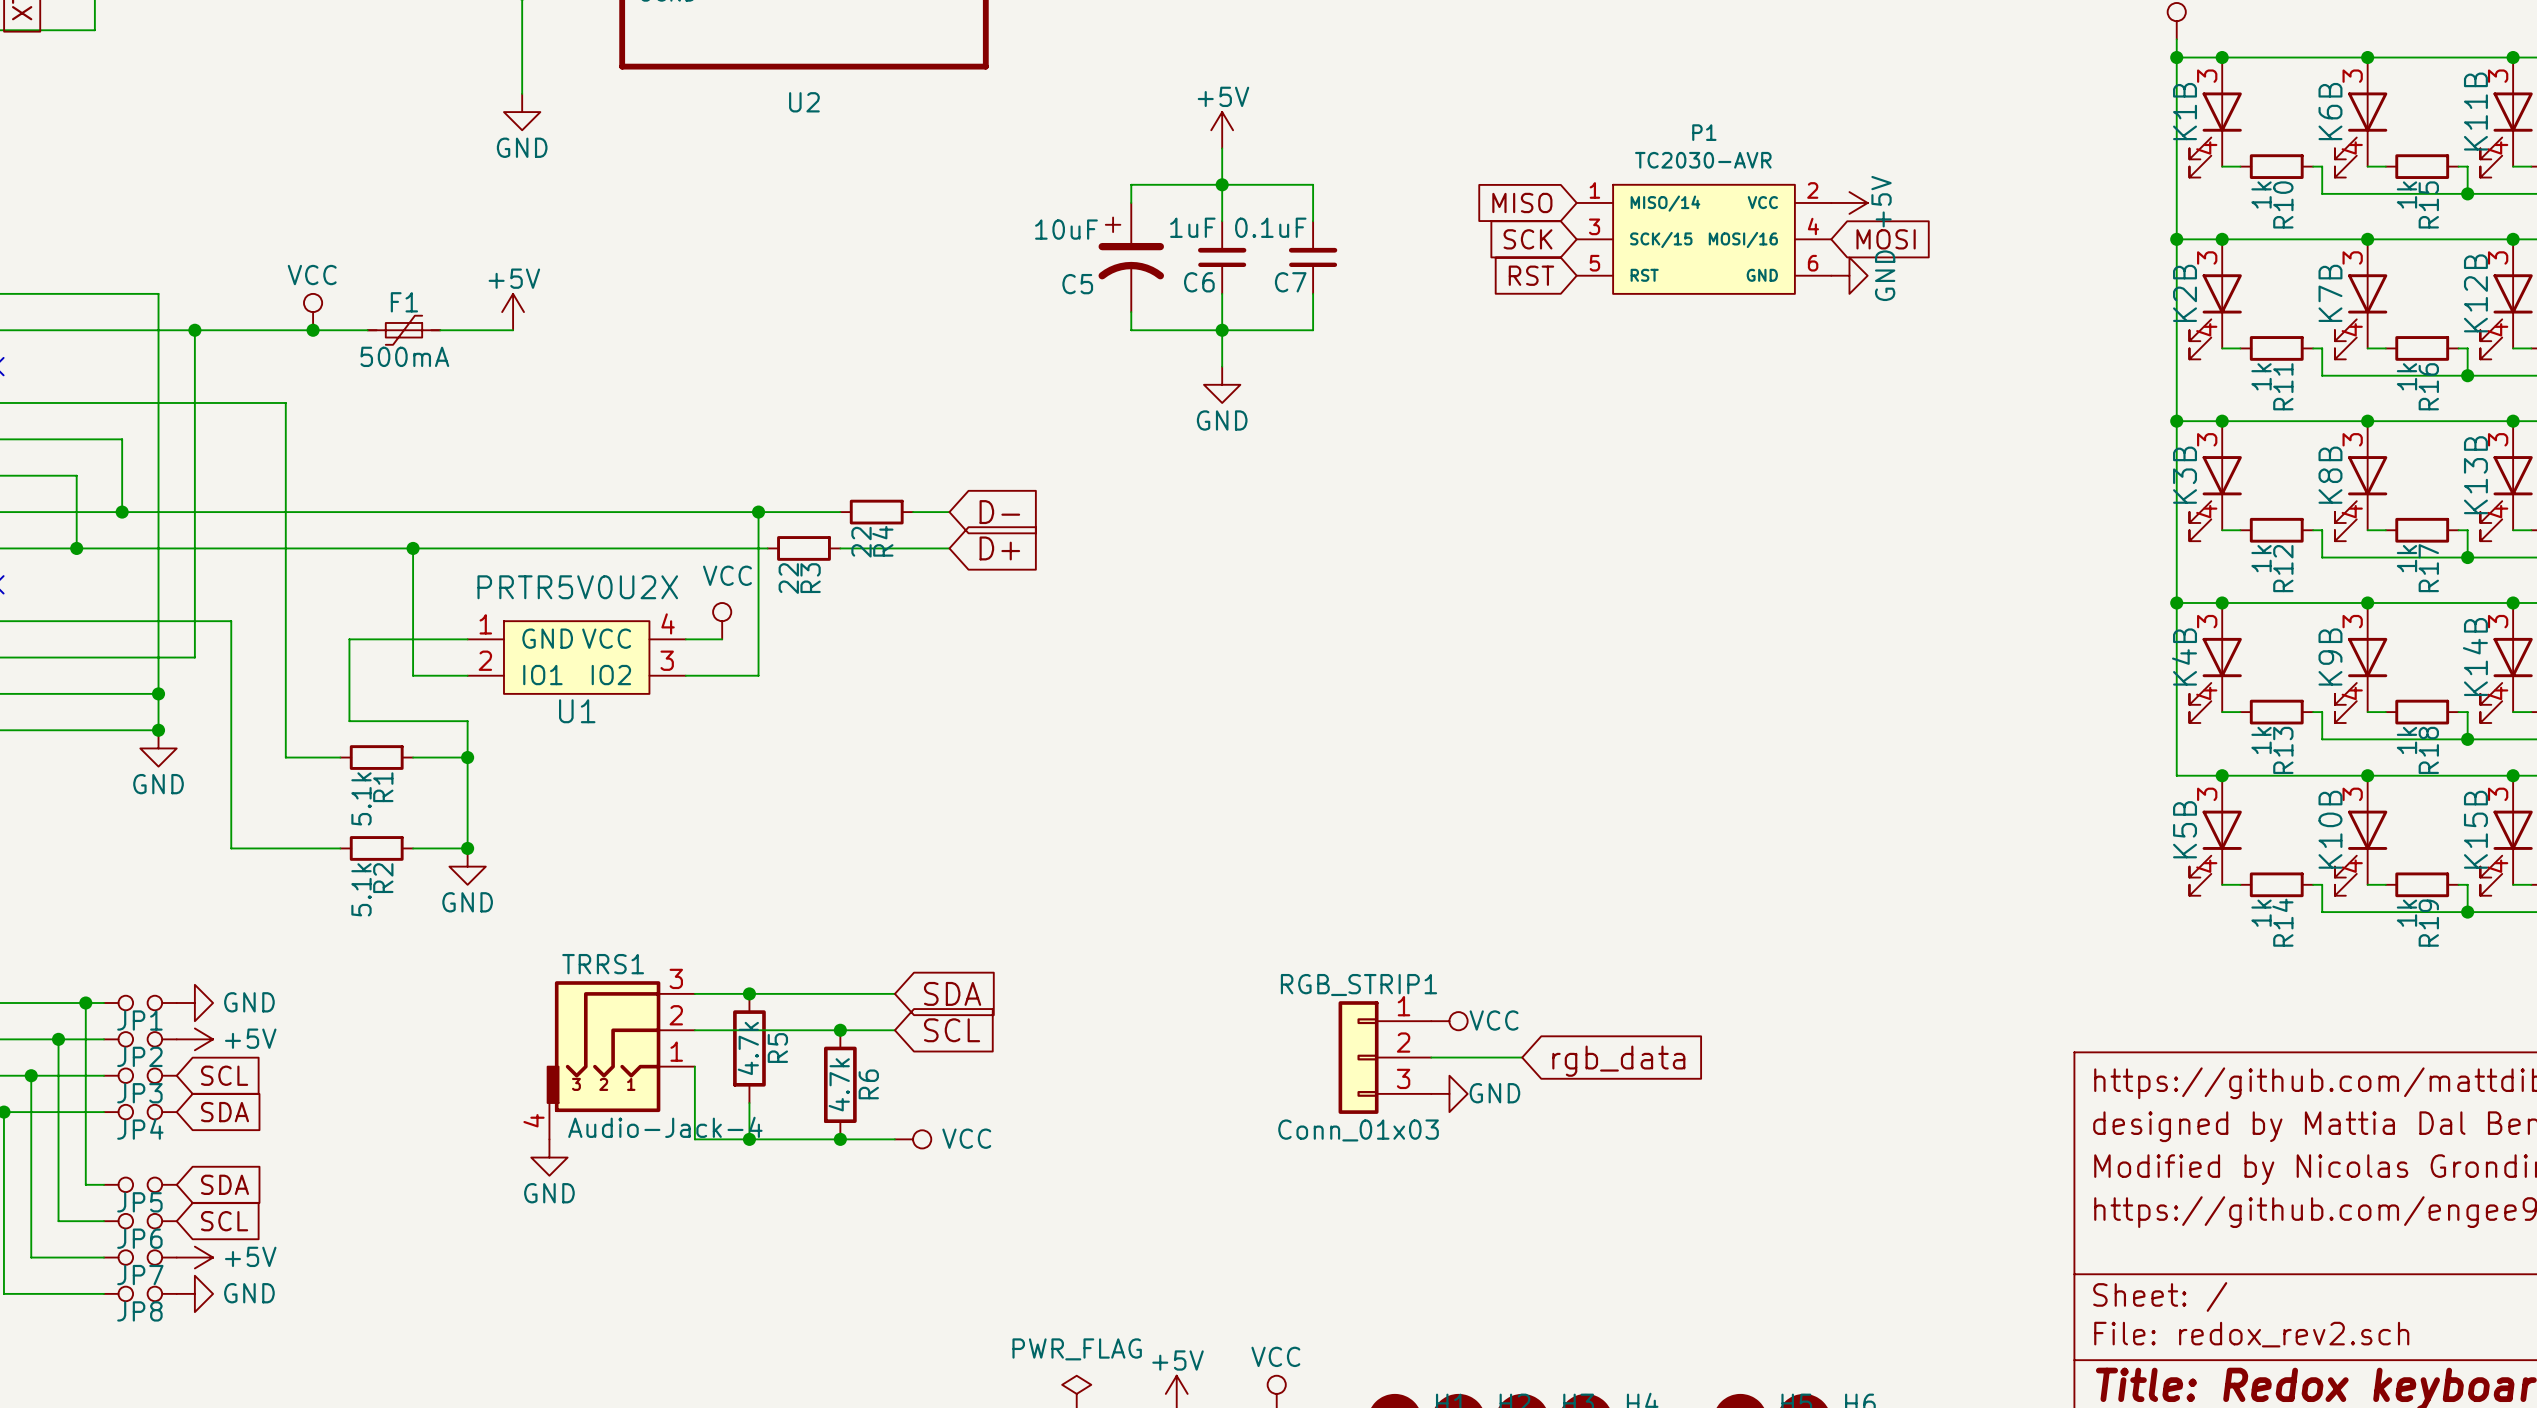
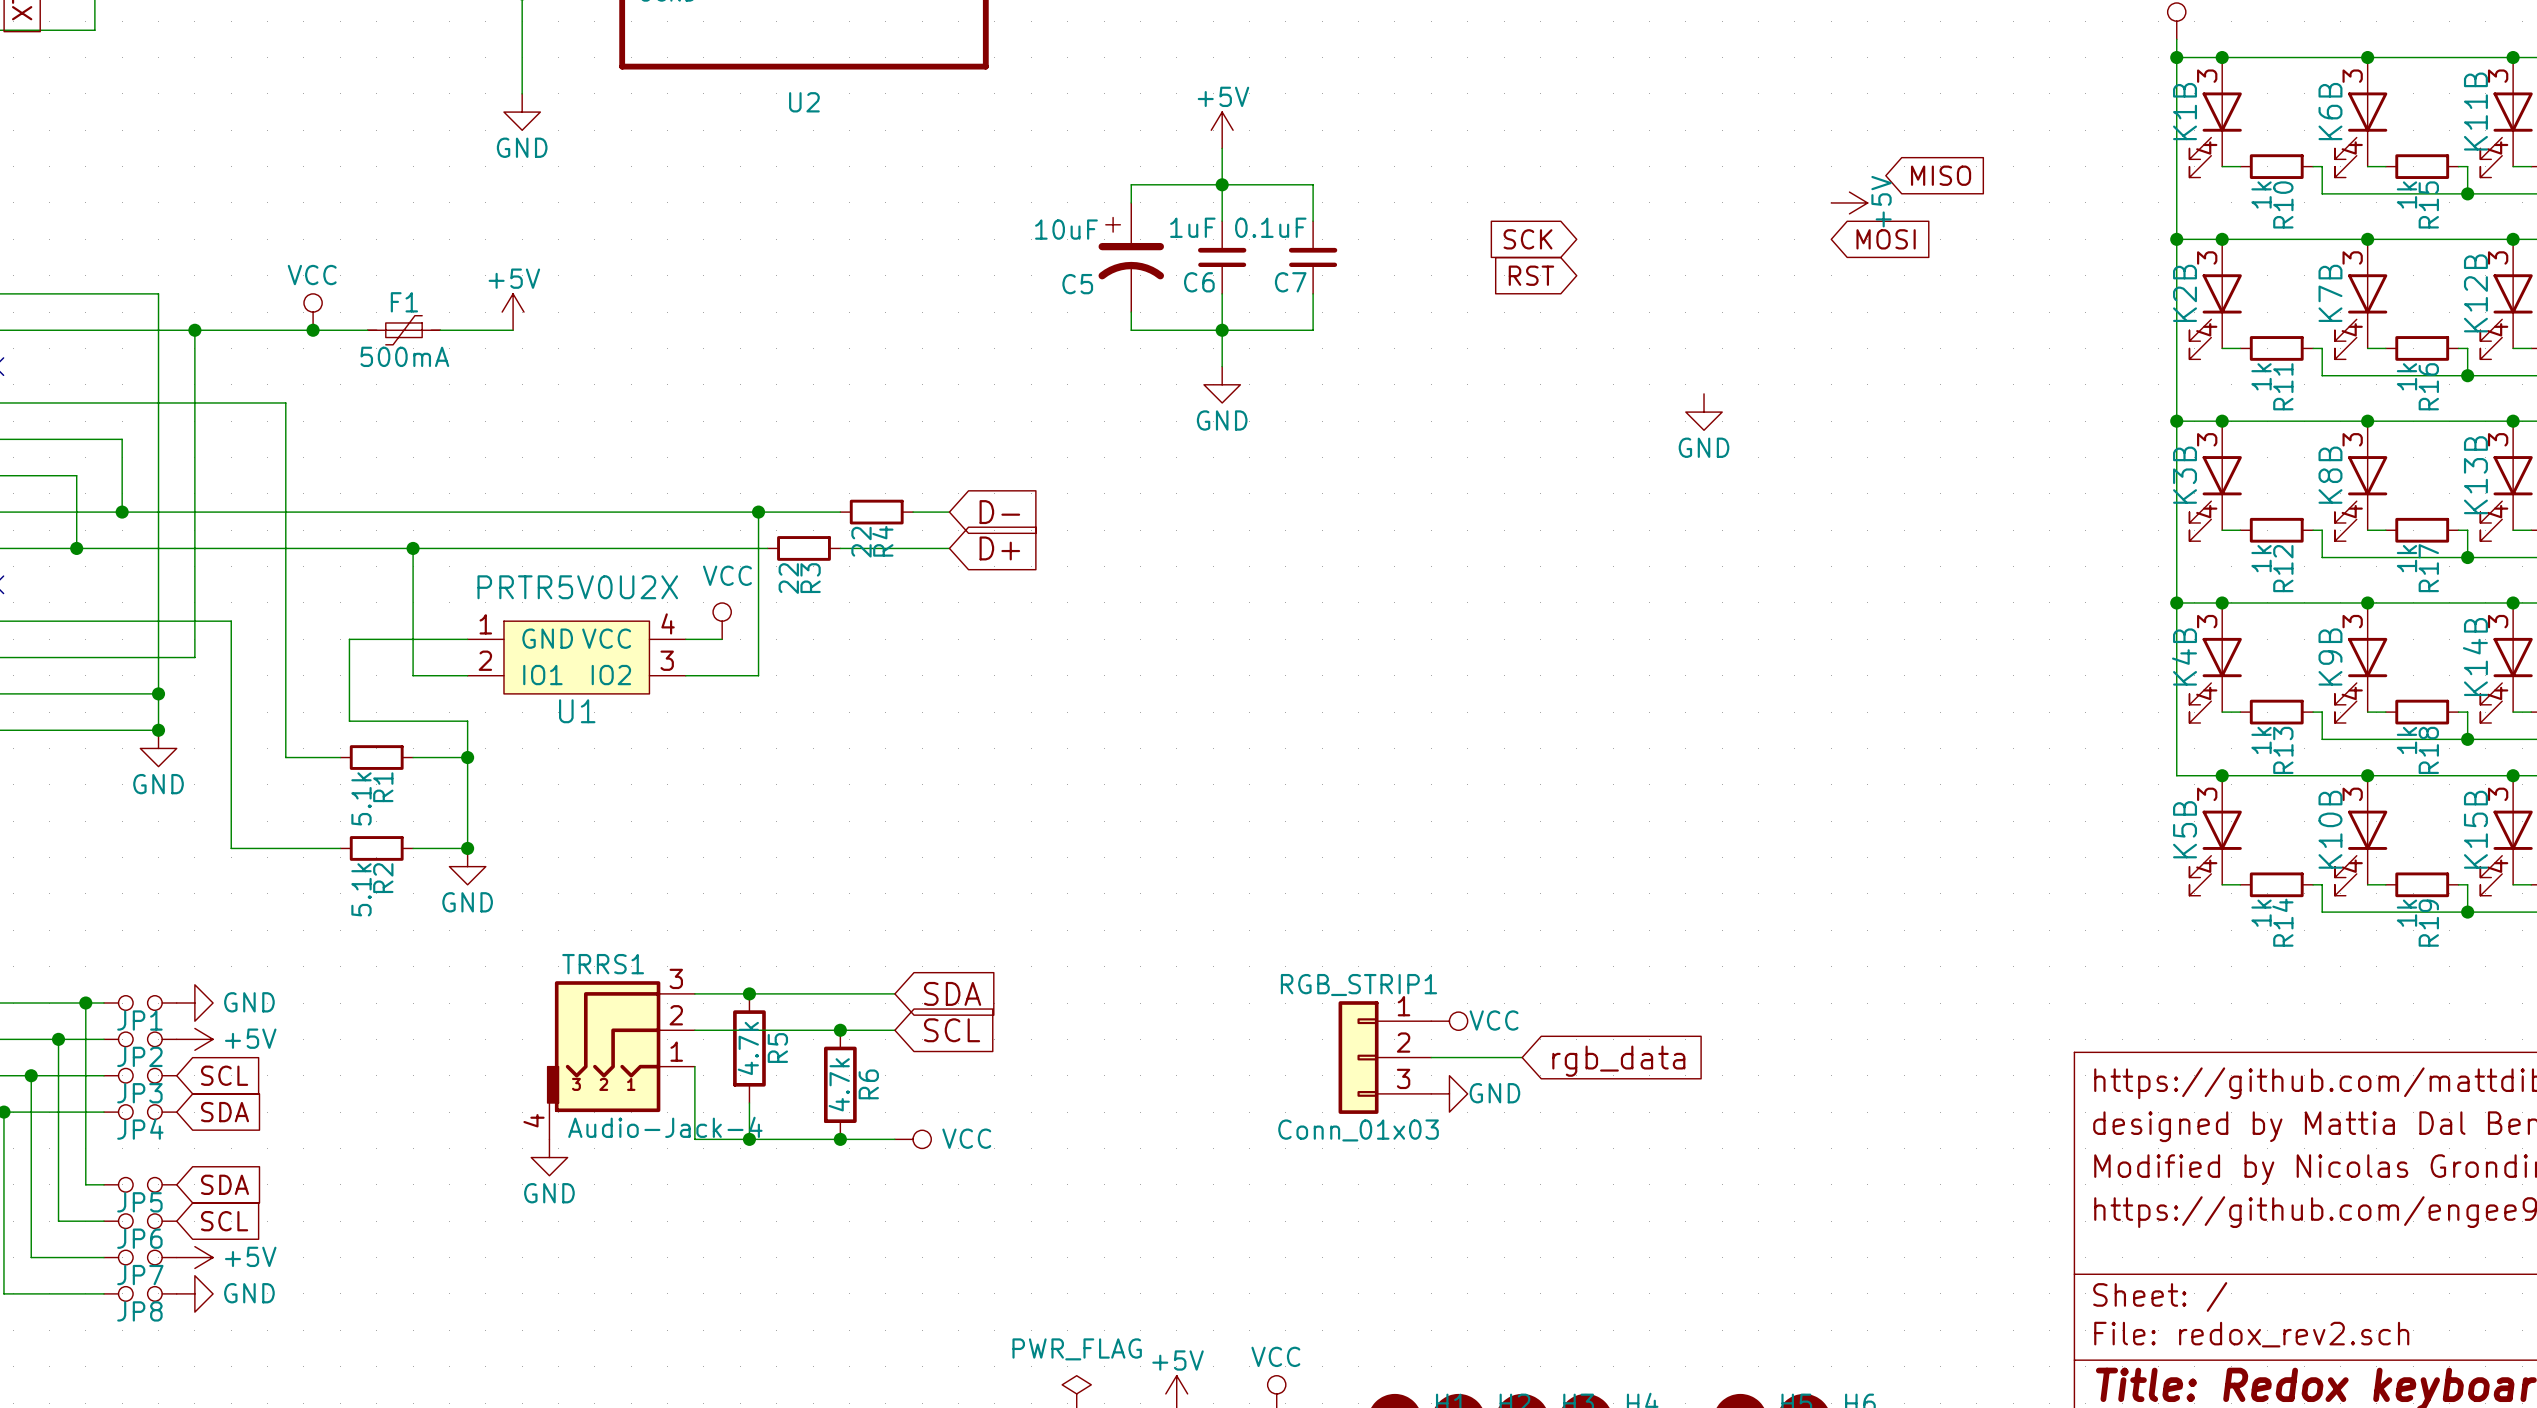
global label rotation: 0° (1522, 202) -> 180° (1941, 175)
global label position: MISO (1522, 202) -> MISO (1941, 175)
P1: TC2030-AVR (1704, 239) -> none
power symbol rotation: 0° (1849, 275) -> 90° clockwise (1704, 412)
power symbol position: GND (1849, 275) -> GND (1704, 412)

